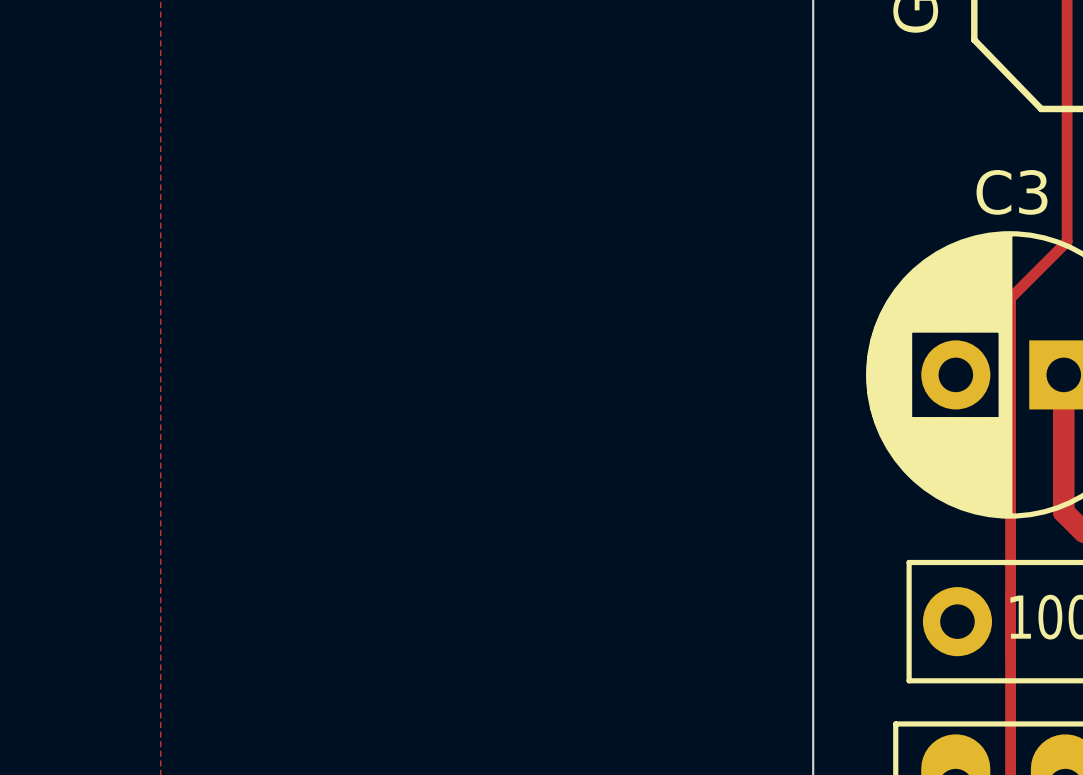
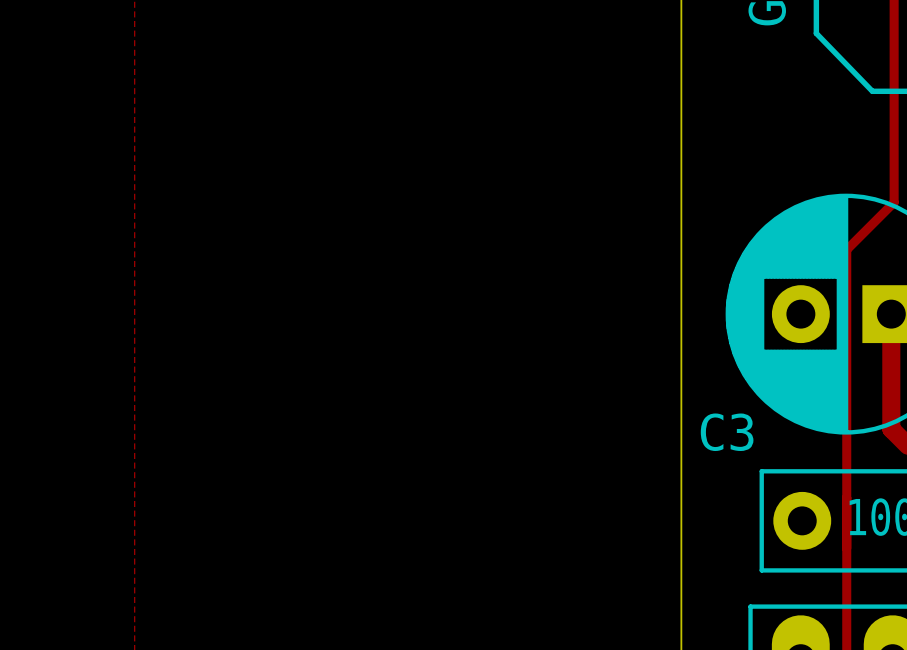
C3 name position: C3 (1012, 192) -> C3 (727, 432)

